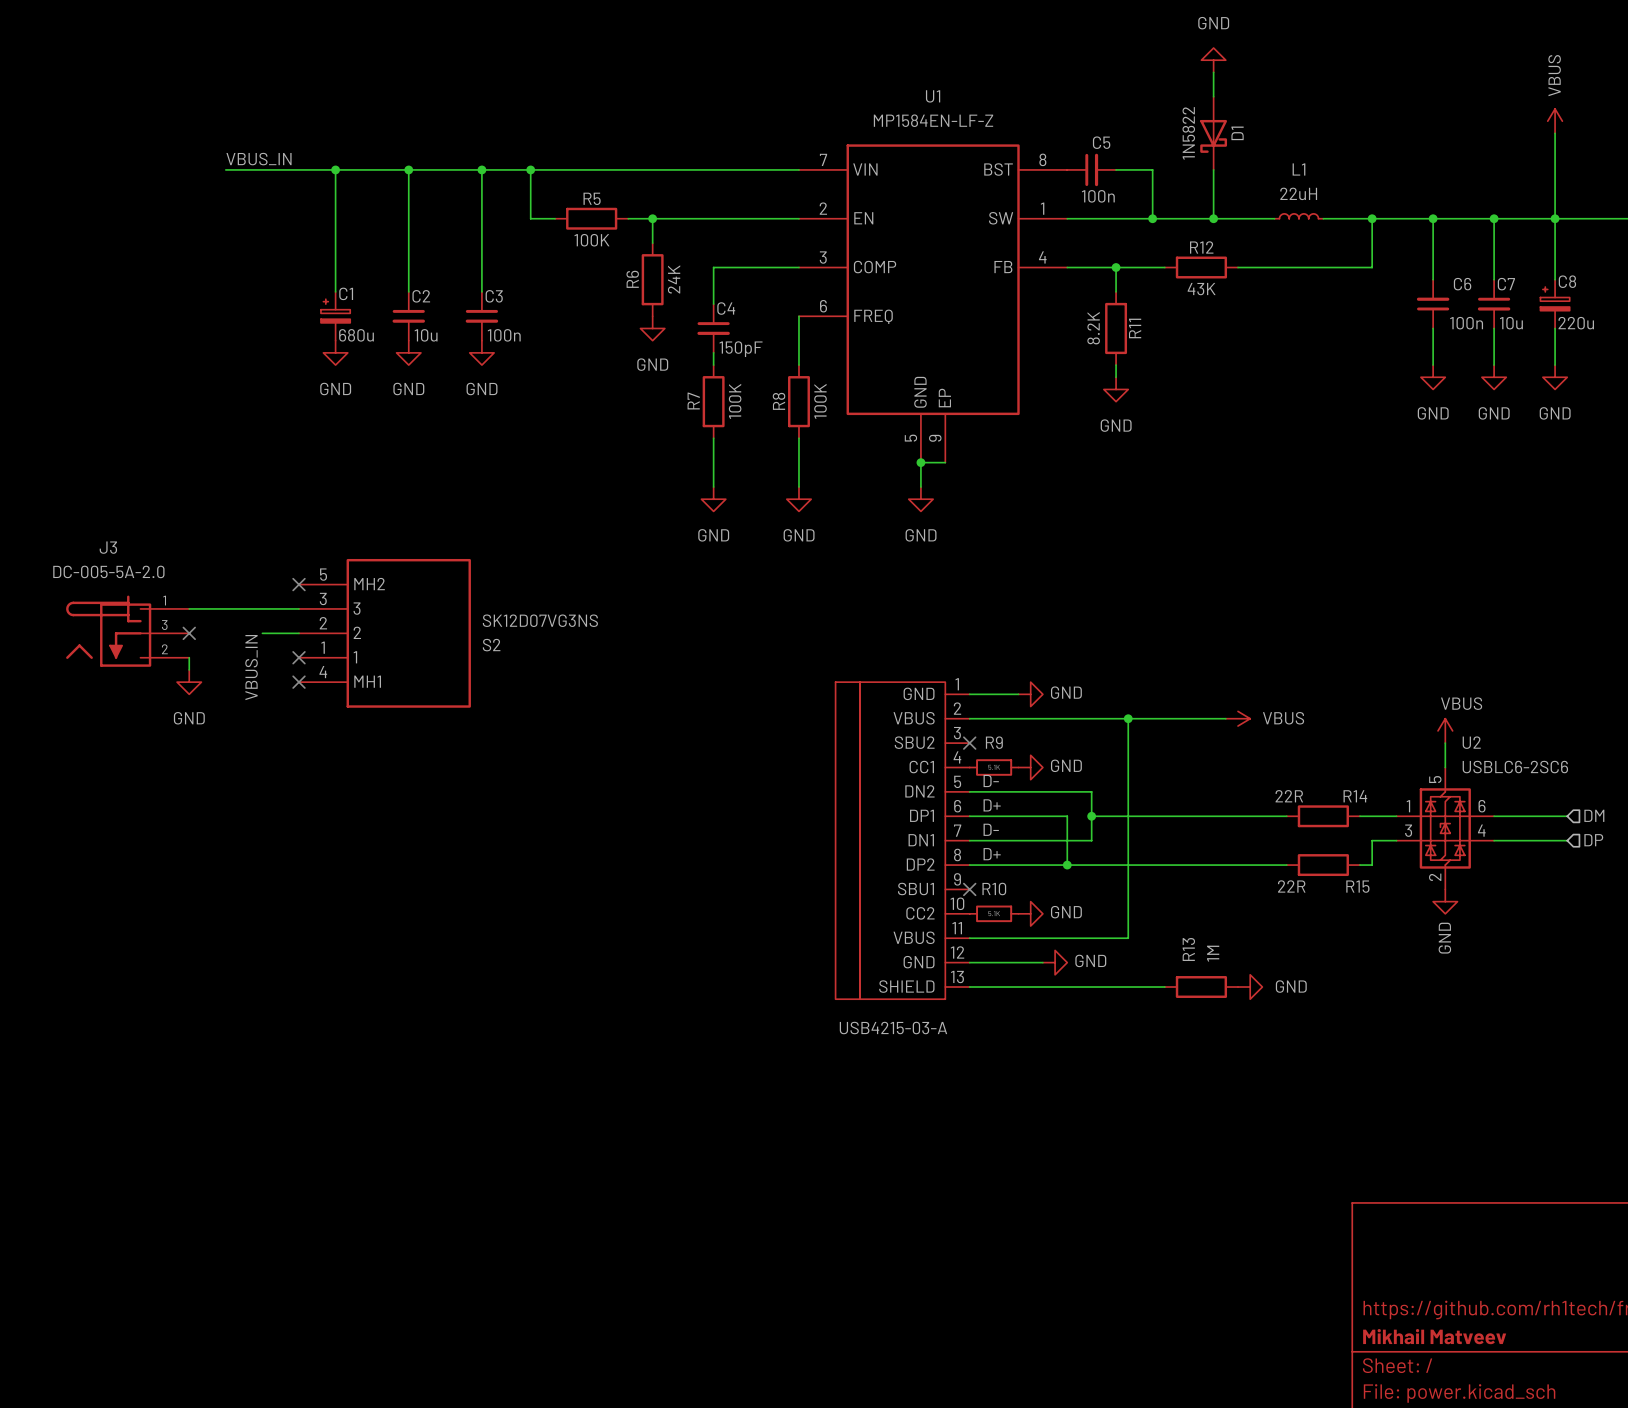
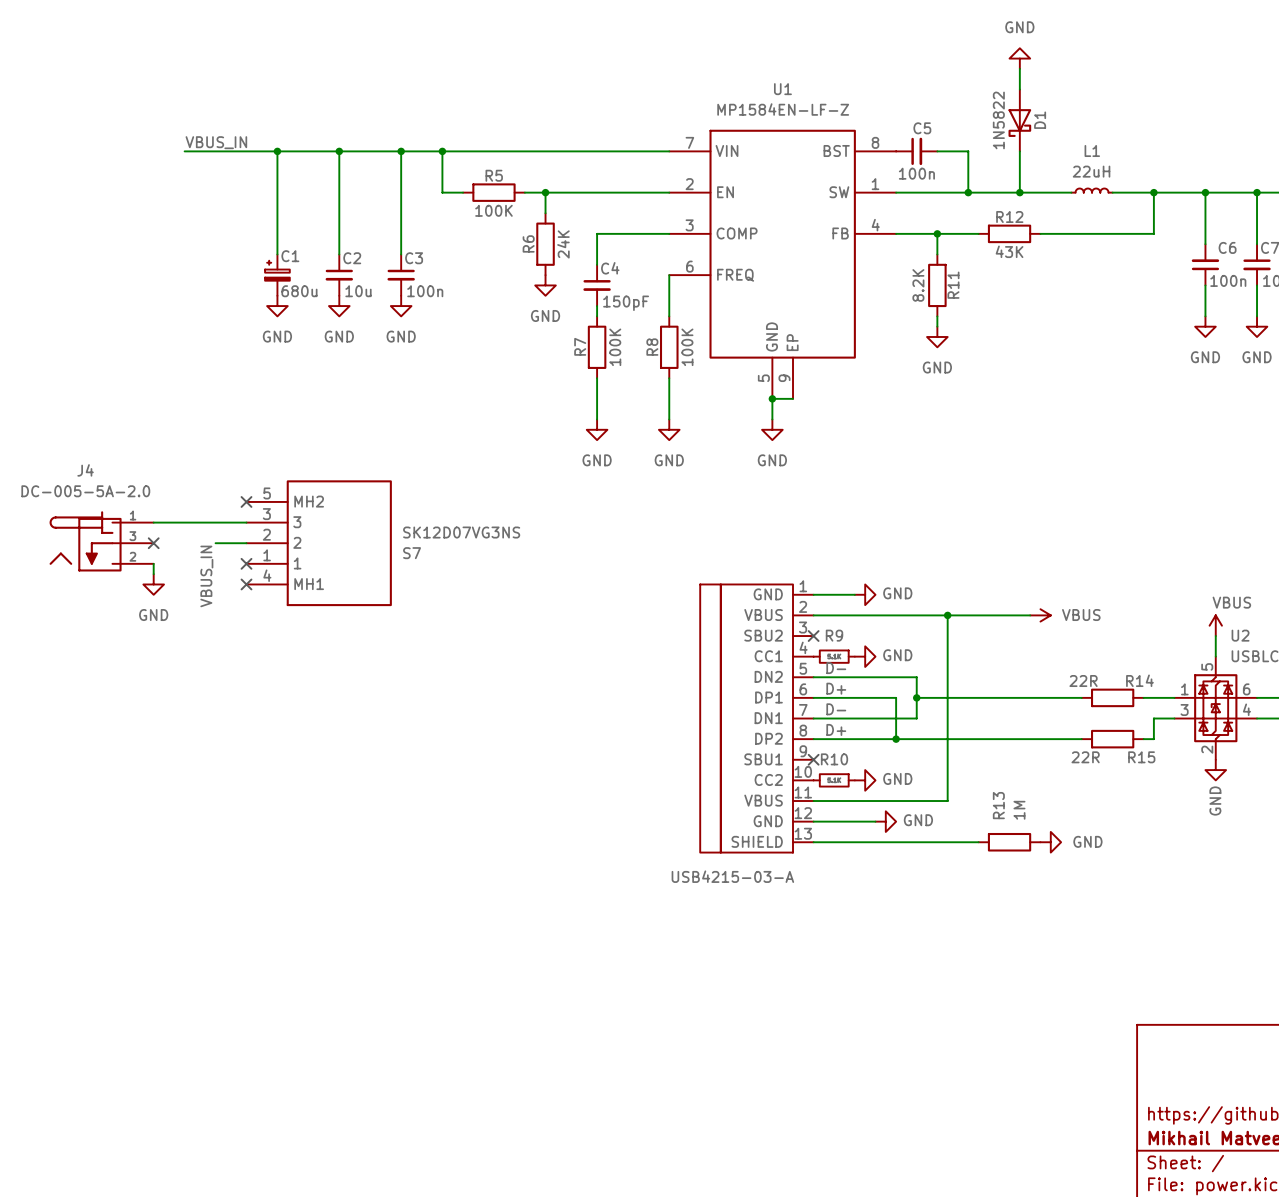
J3 name: J3 (108, 547) -> J4 (85, 470)
S2 name: S2 (491, 645) -> S7 (412, 553)

